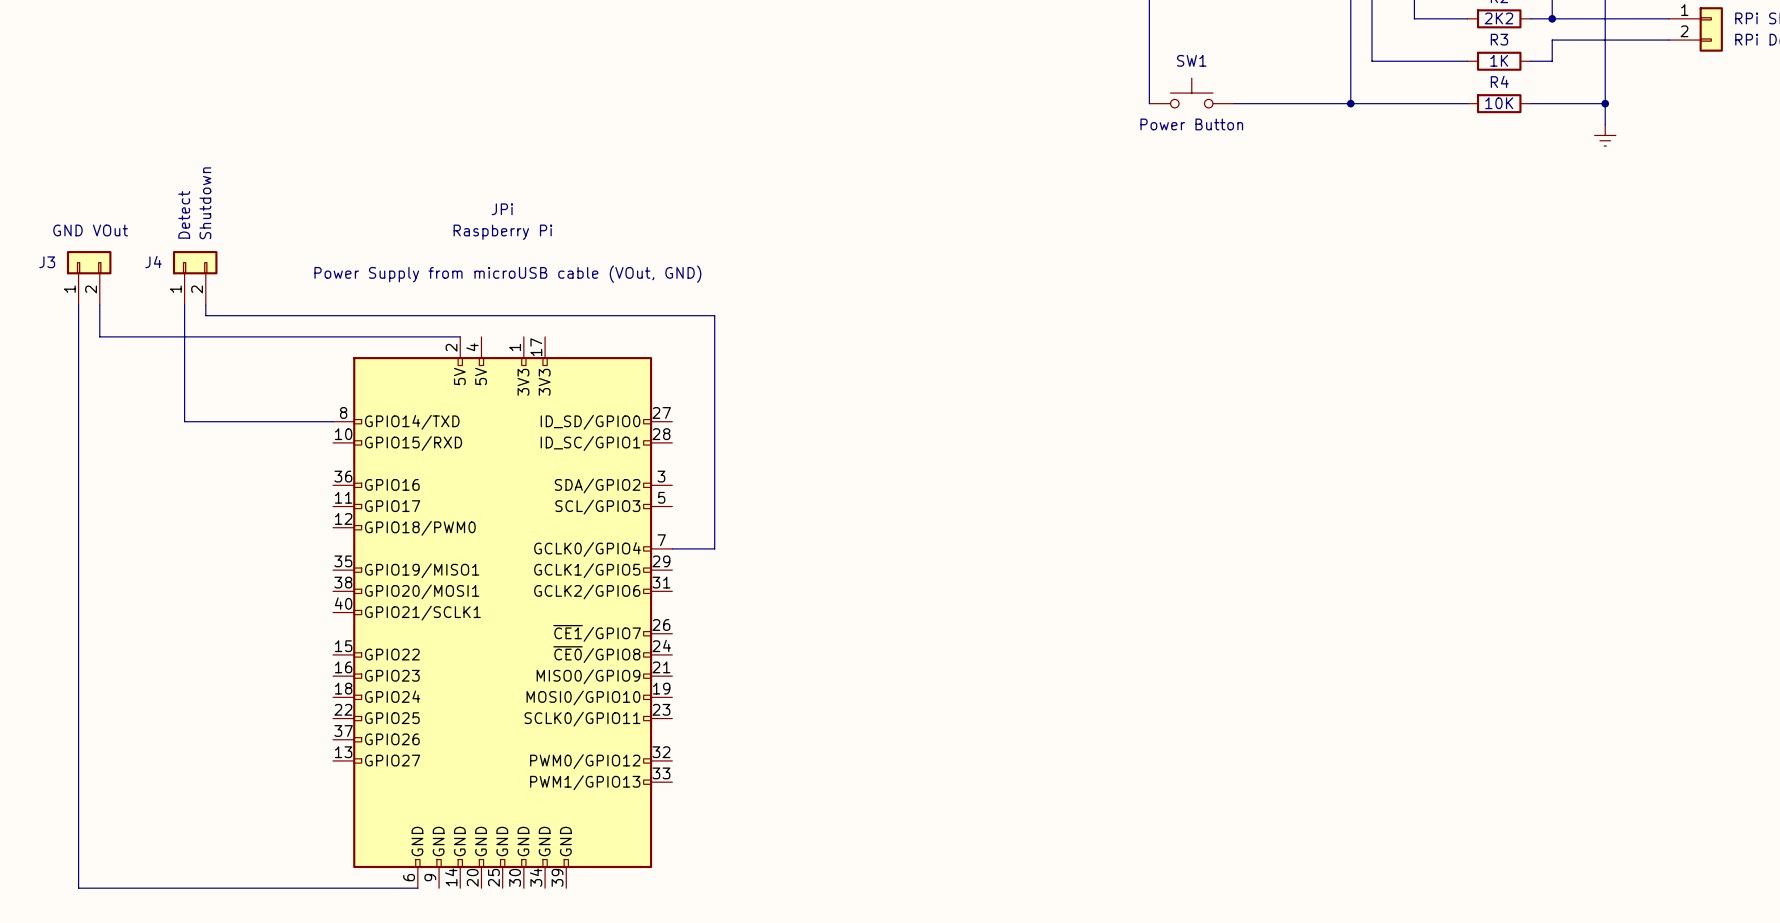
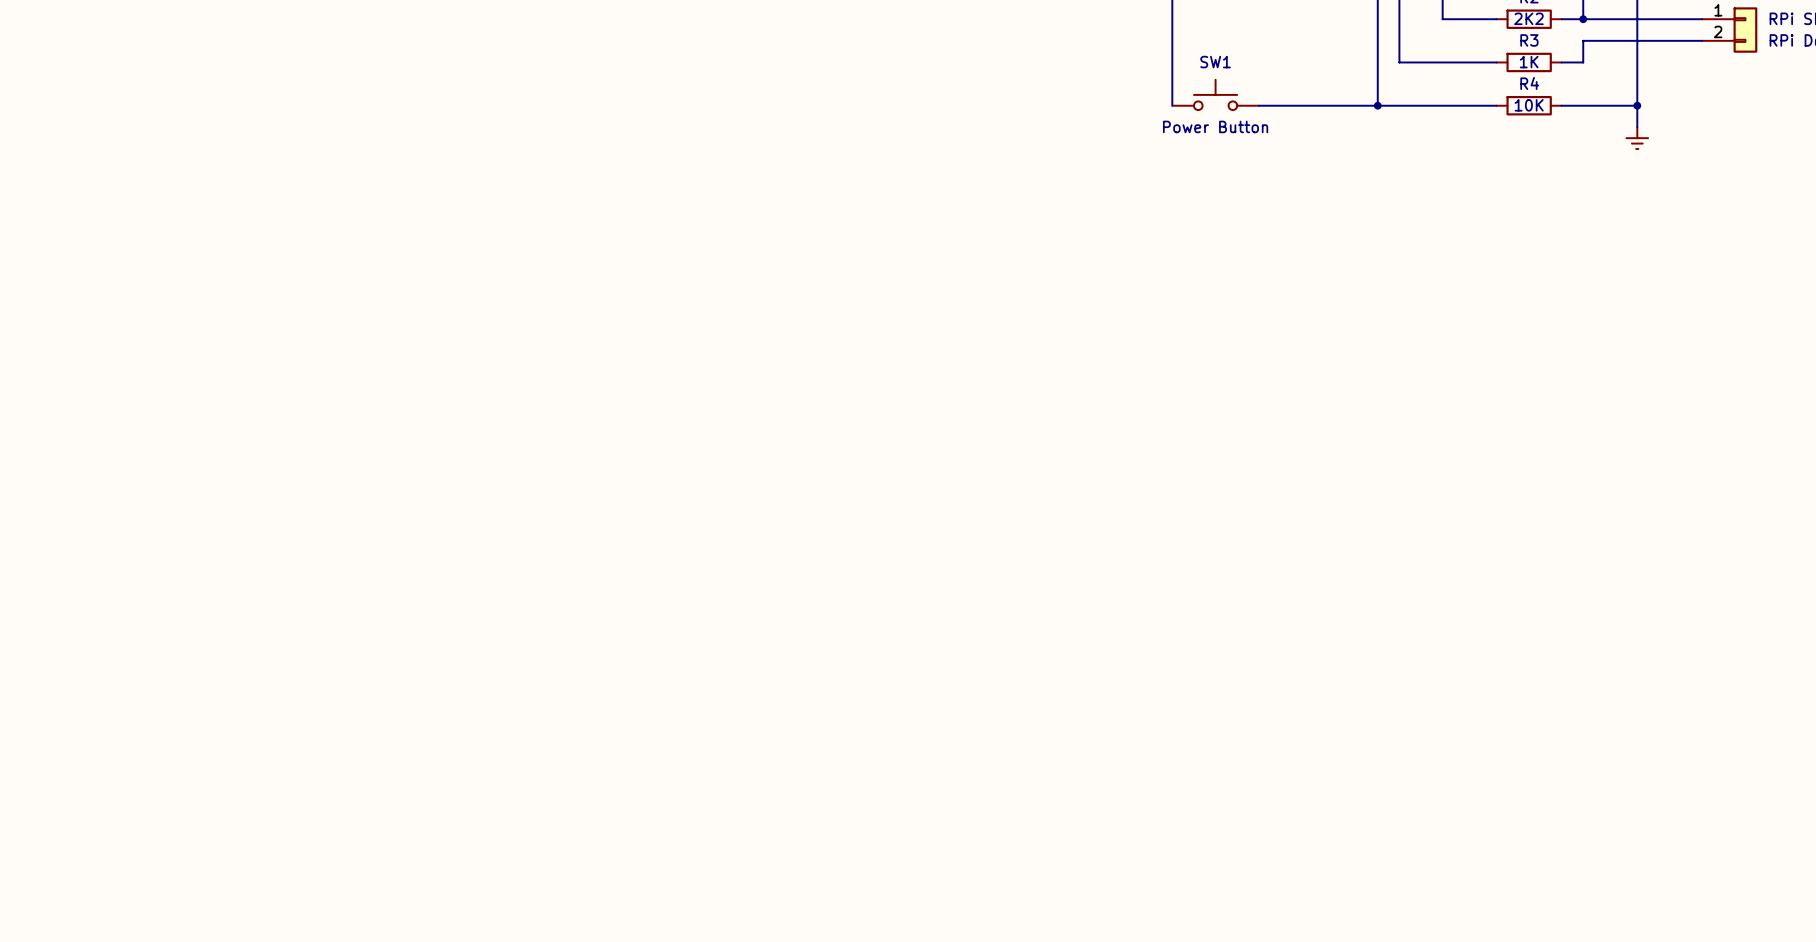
J3: (89, 278) -> none
J4: (195, 278) -> none
wire: (78, 305) (78, 888) (417, 888) -> none
wire: (99, 305) (99, 336) (460, 336) -> none
wire: (184, 305) (184, 421) (333, 421) -> none
wire: (205, 305) (205, 315) (714, 315) (714, 548) (672, 548) -> none
JPi: Raspberry Pi (502, 612) -> none

